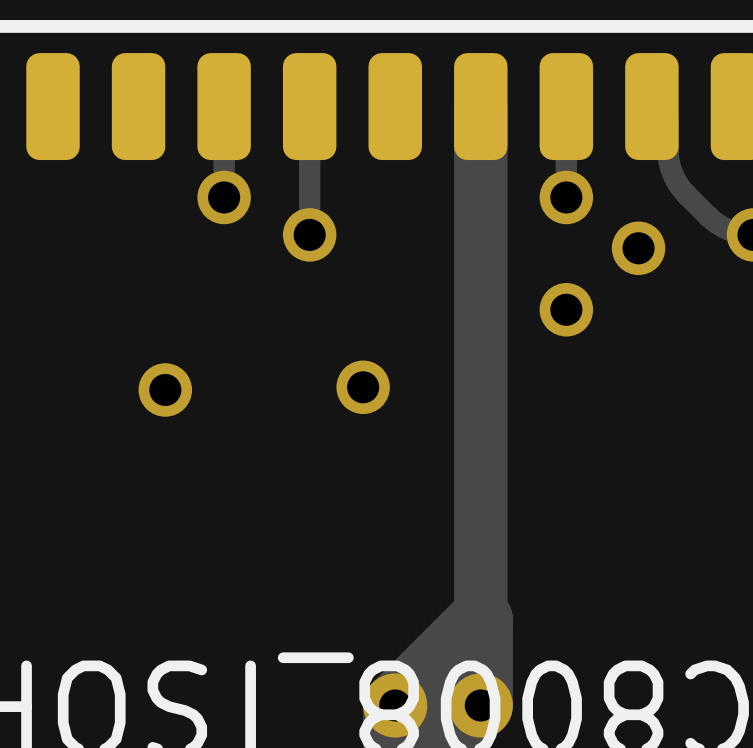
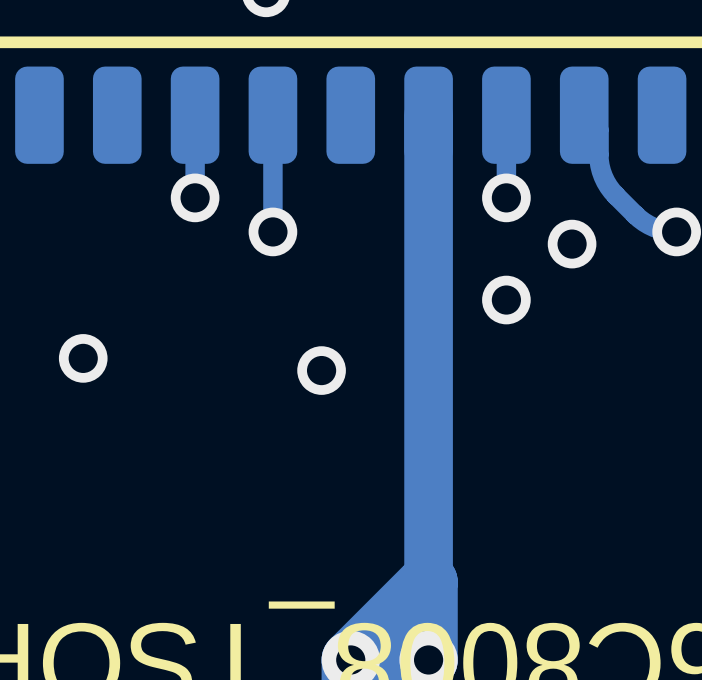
via position: (165, 389) -> (83, 358)

